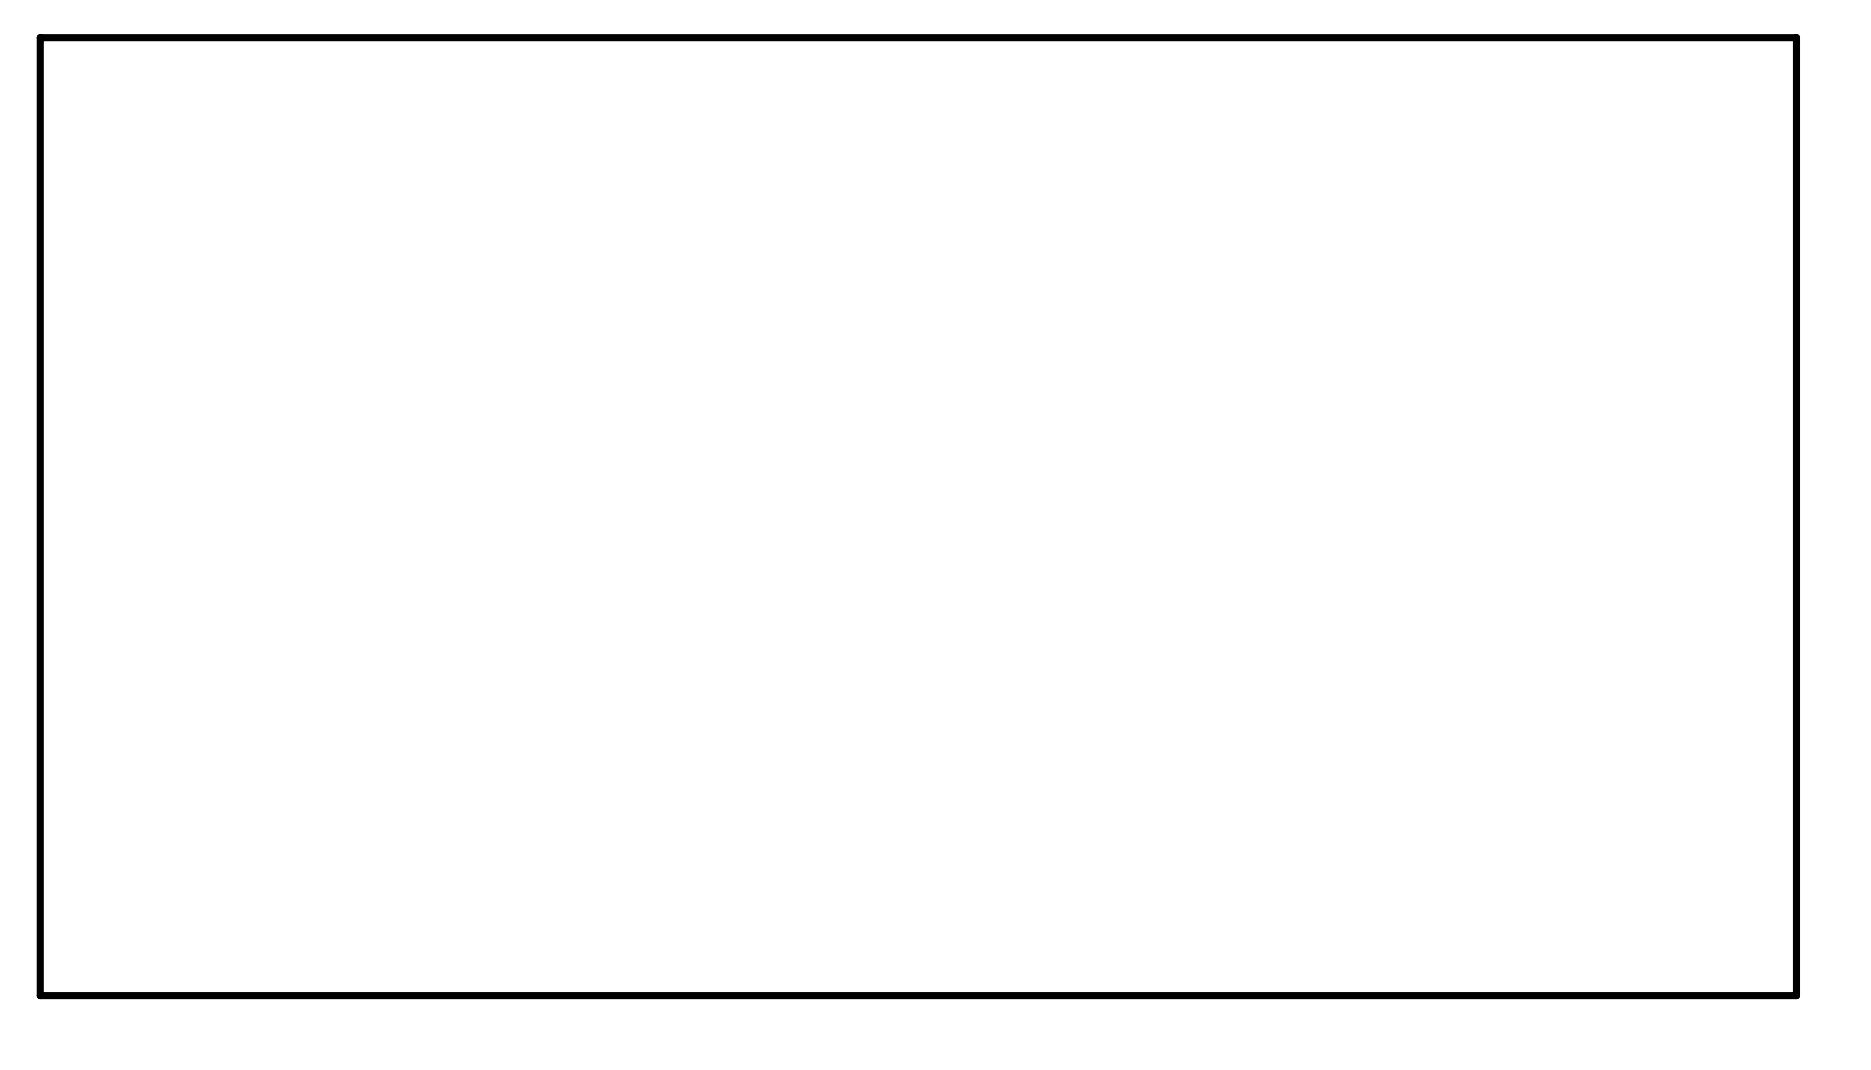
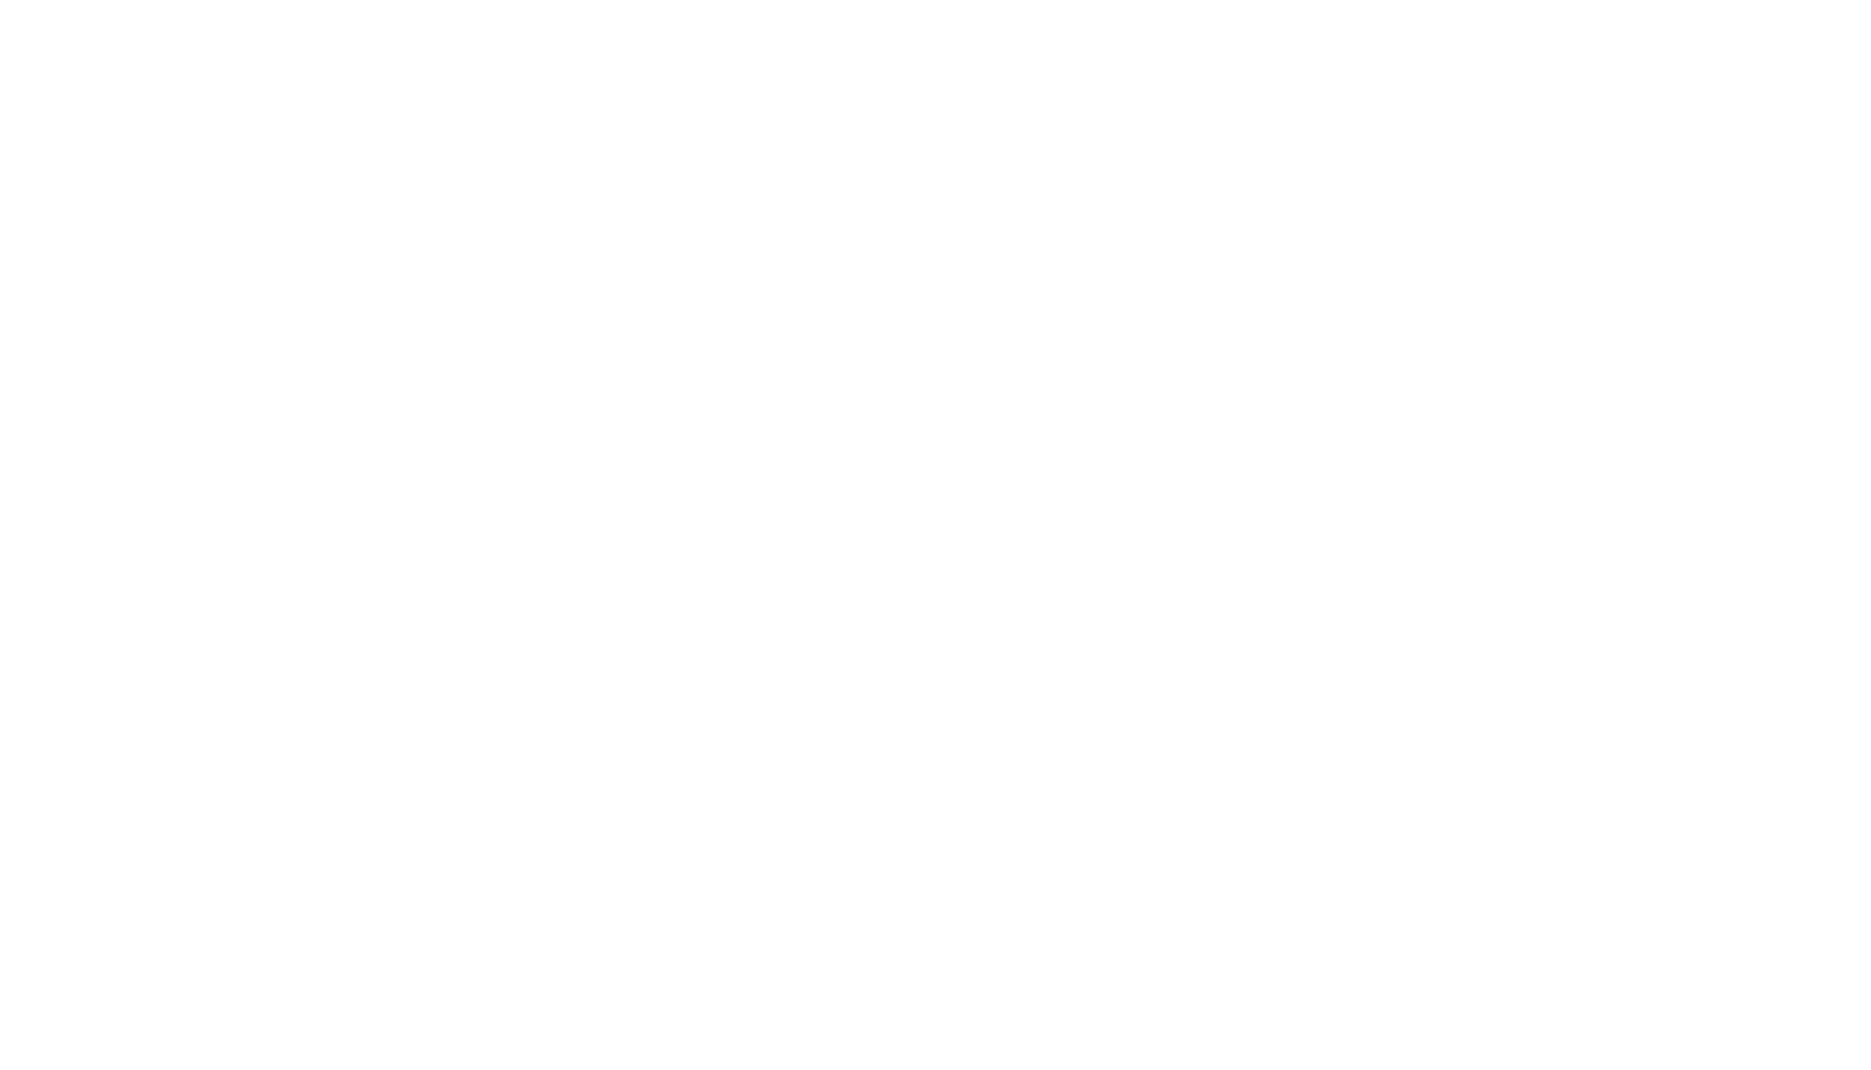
board edge: (1796, 37) (1796, 995) (40, 995) (40, 37) (1796, 37) -> none

